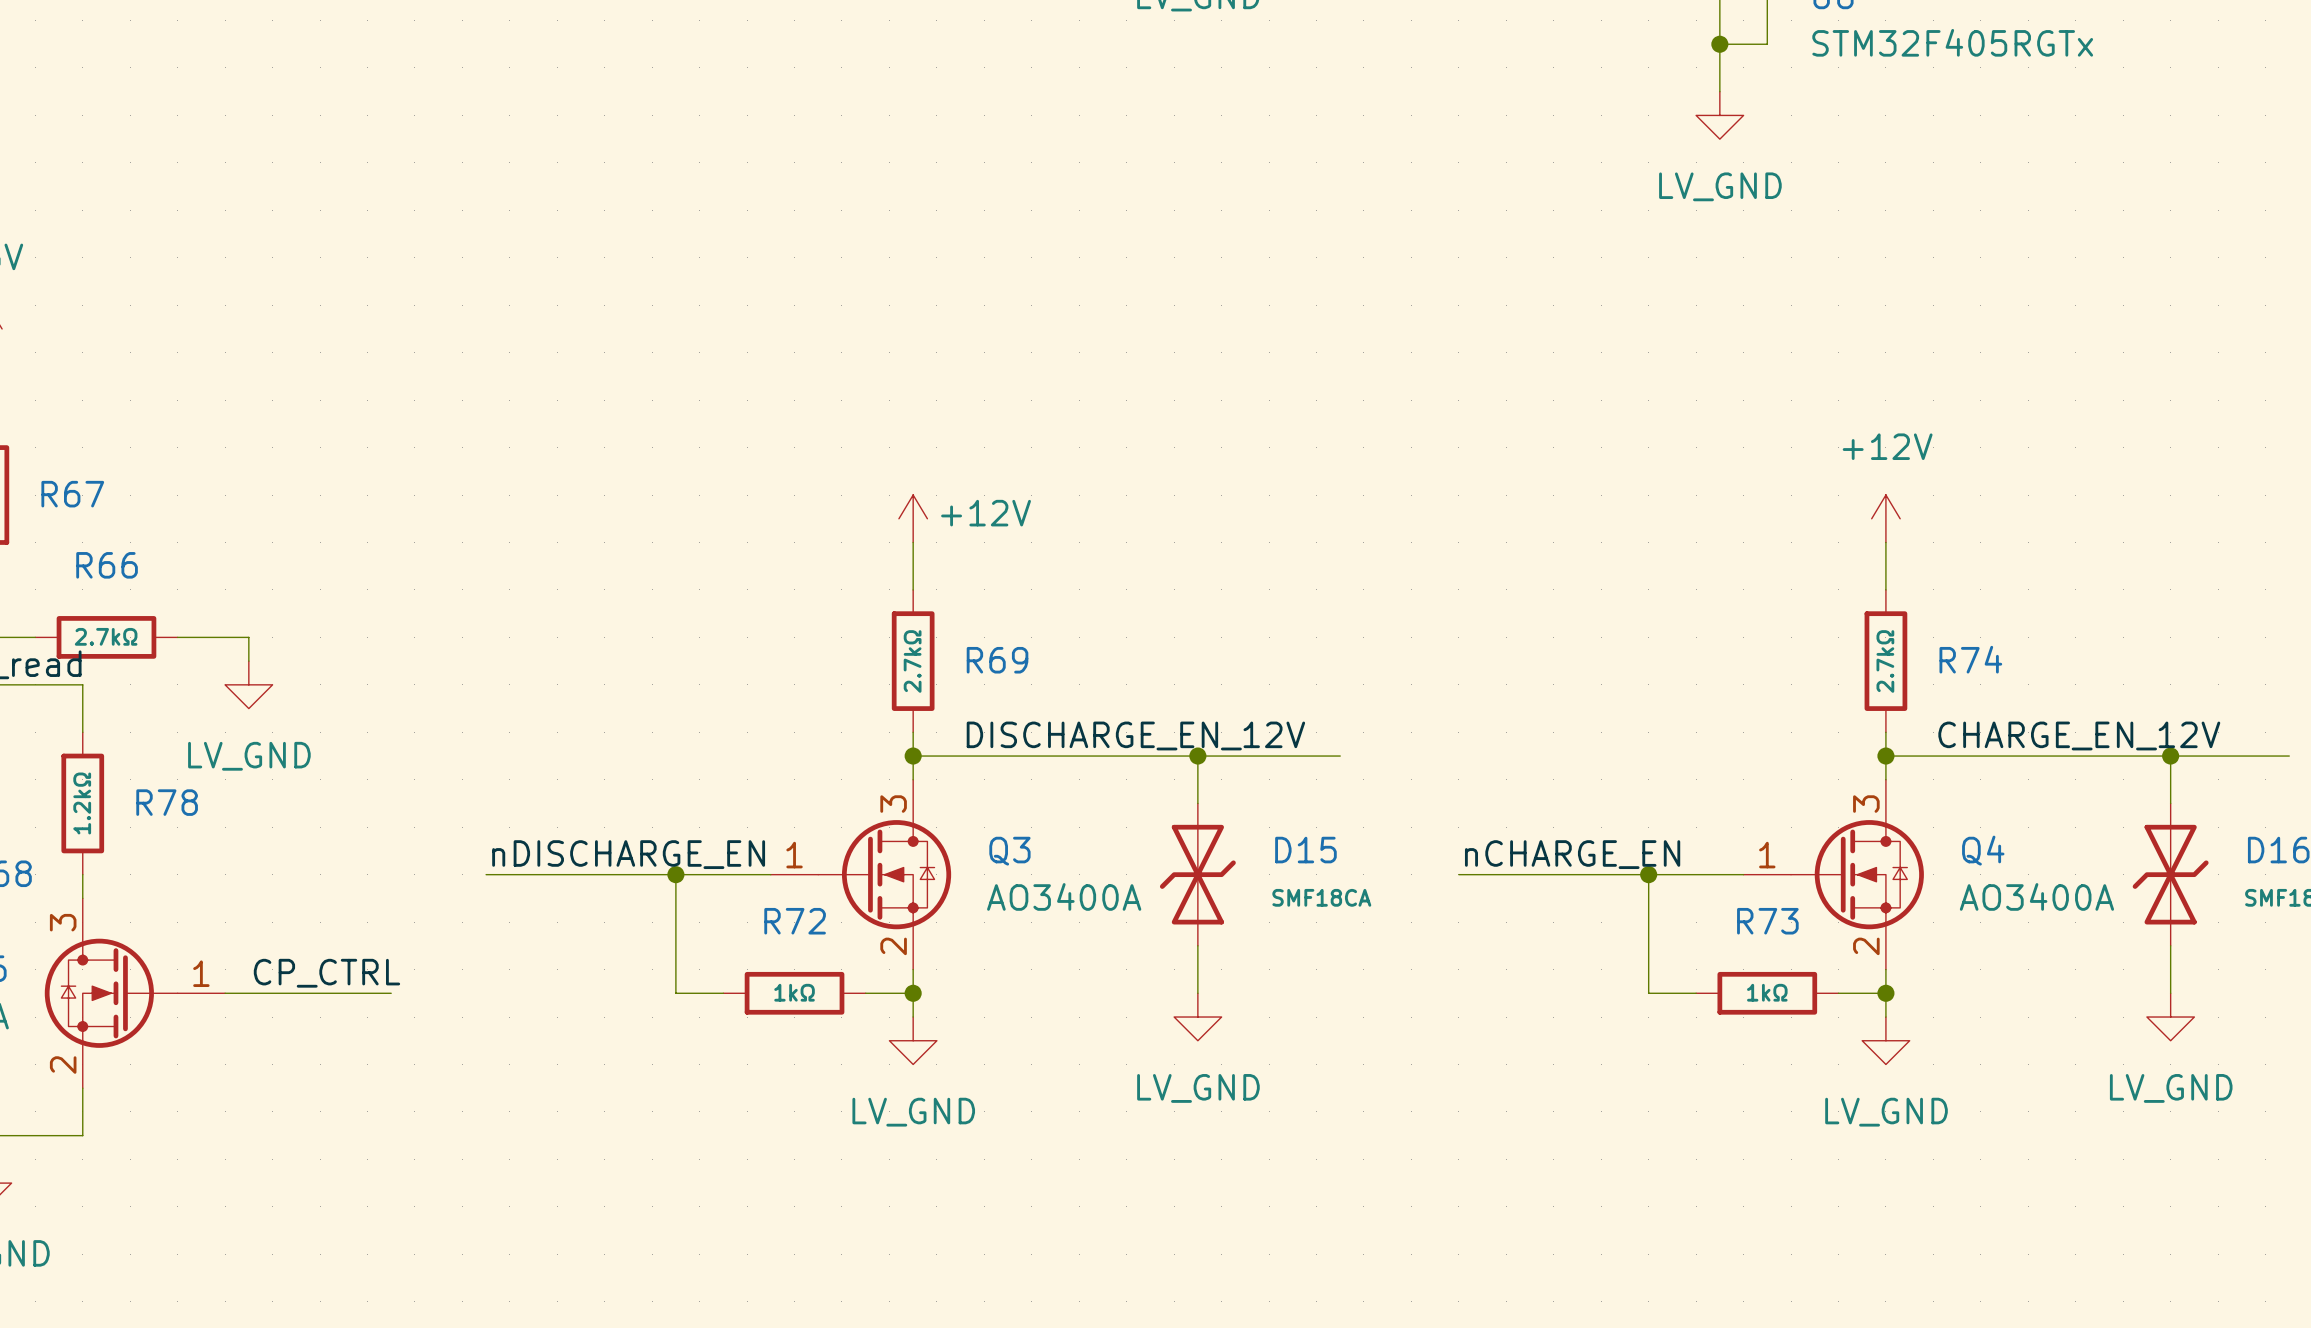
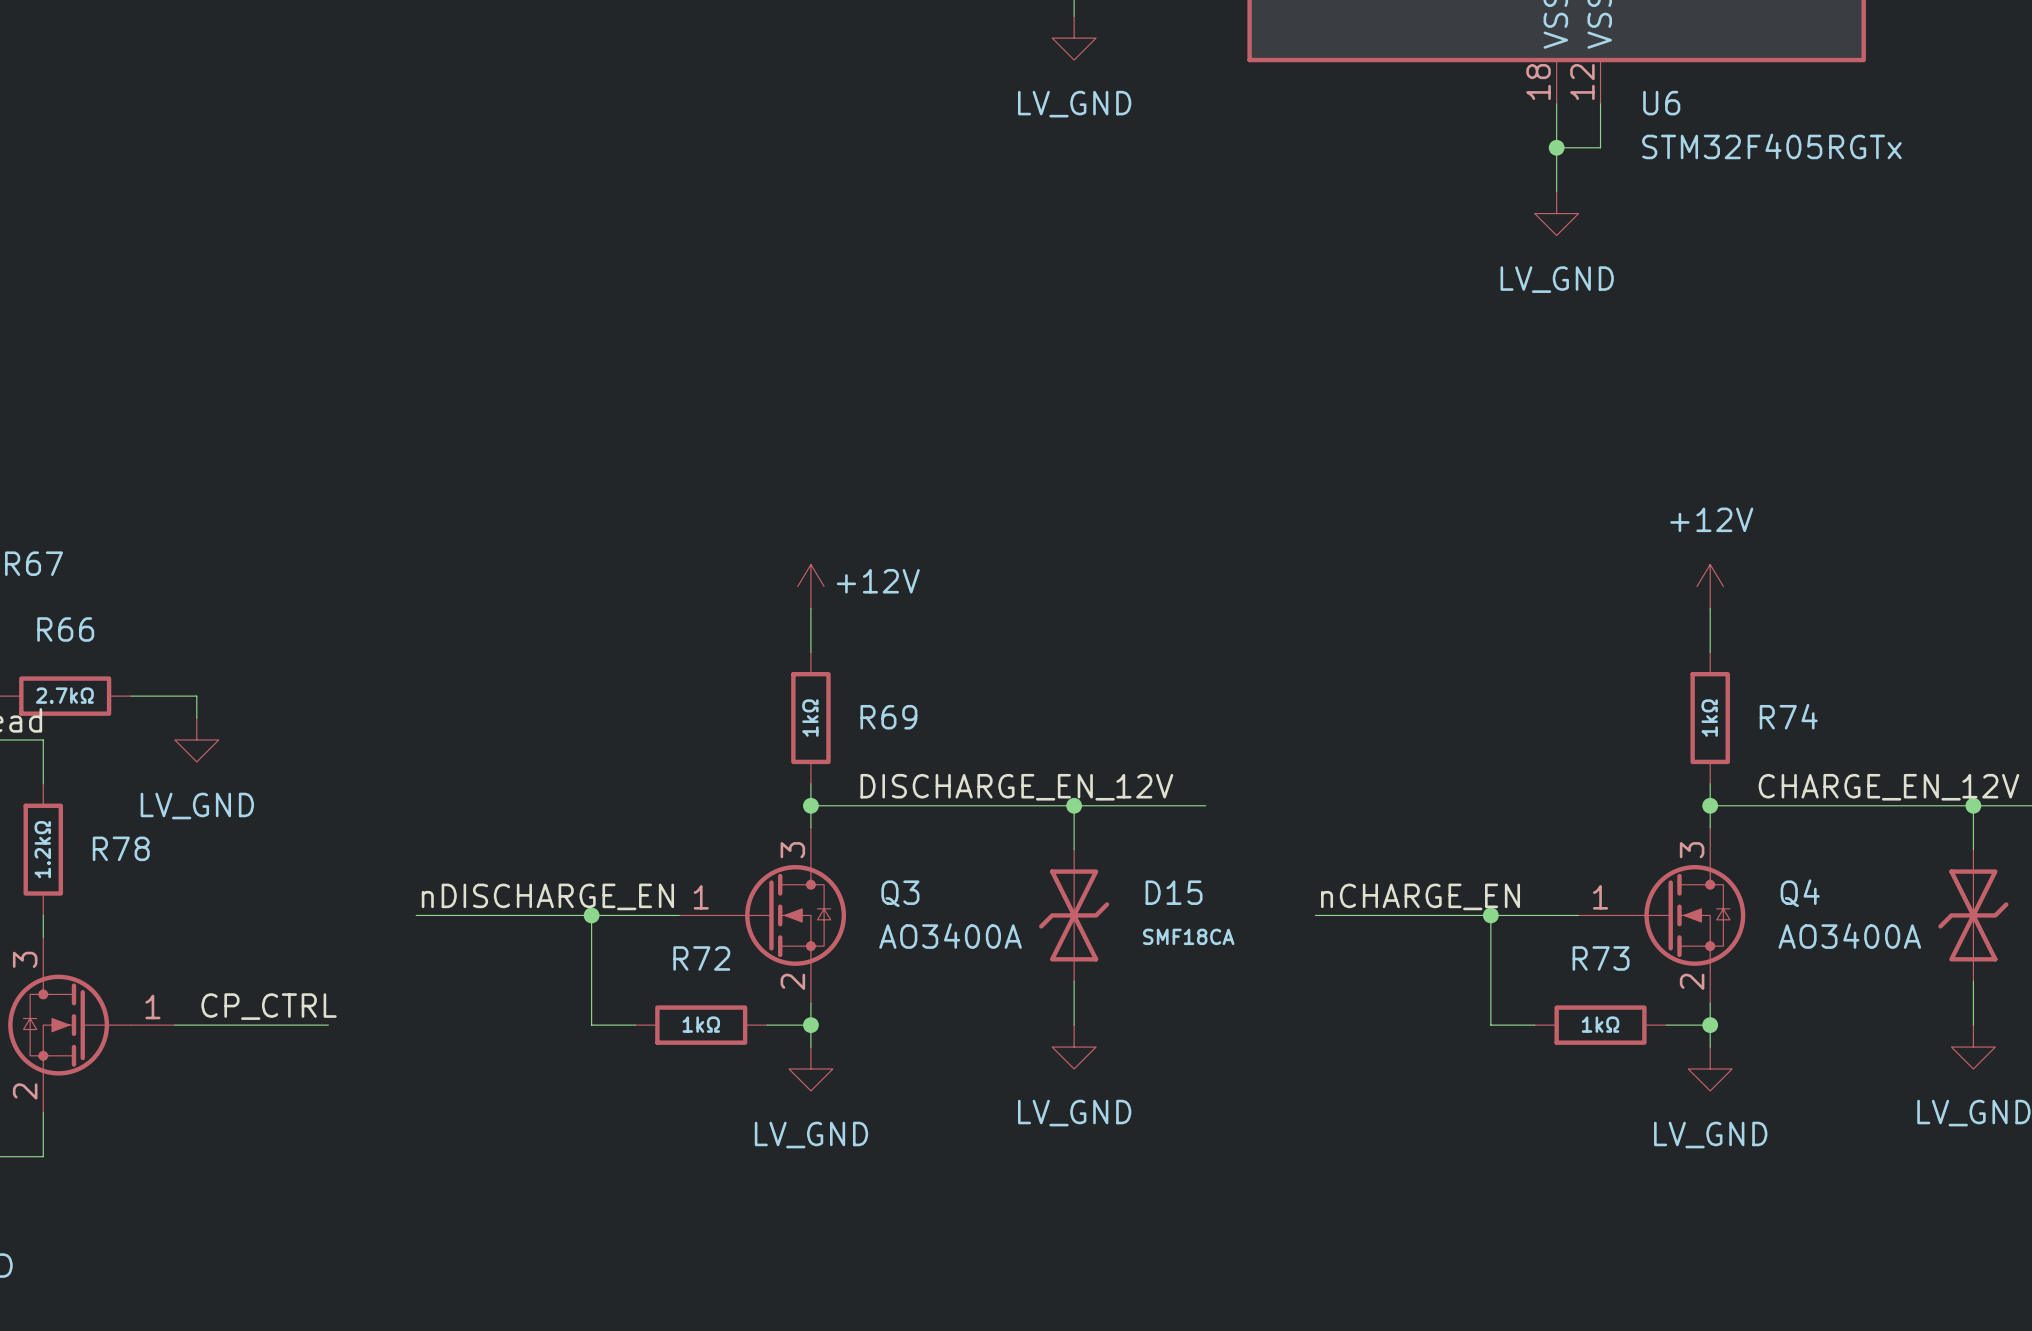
R69 value: 2.7kΩ (912, 661) -> 1kΩ (810, 718)
R74 value: 2.7kΩ (1885, 661) -> 1kΩ (1709, 718)

